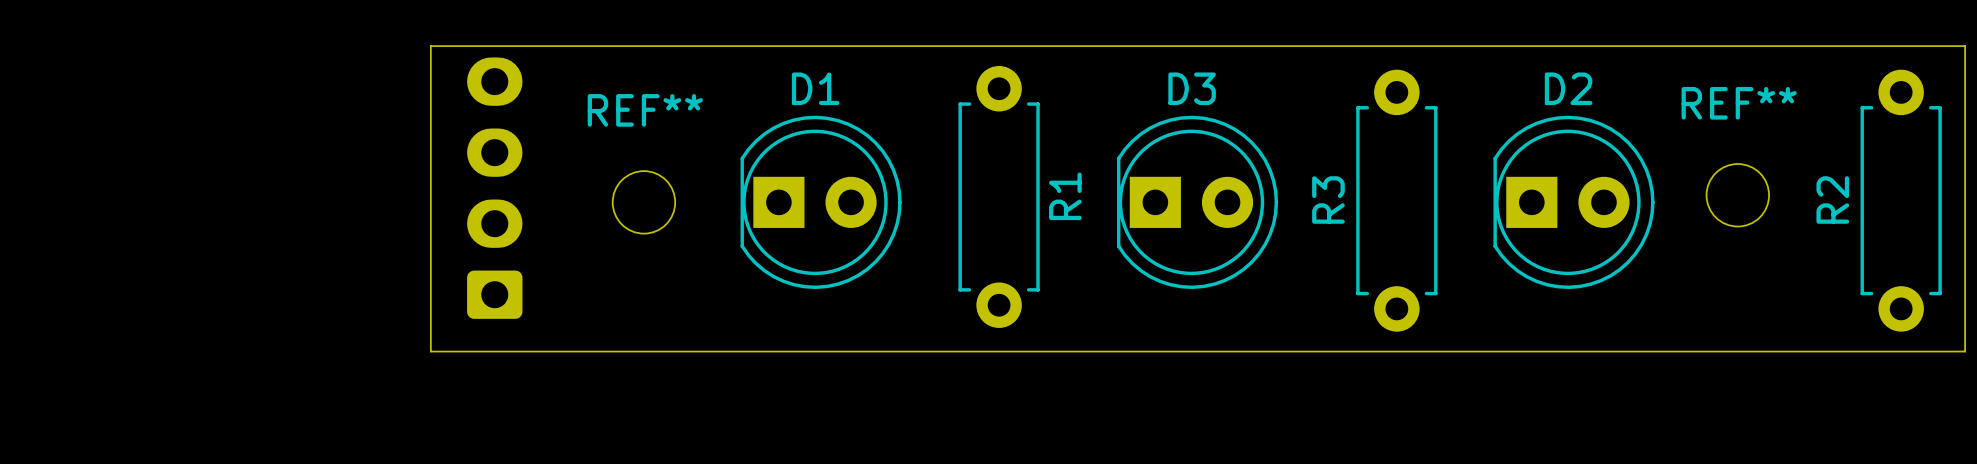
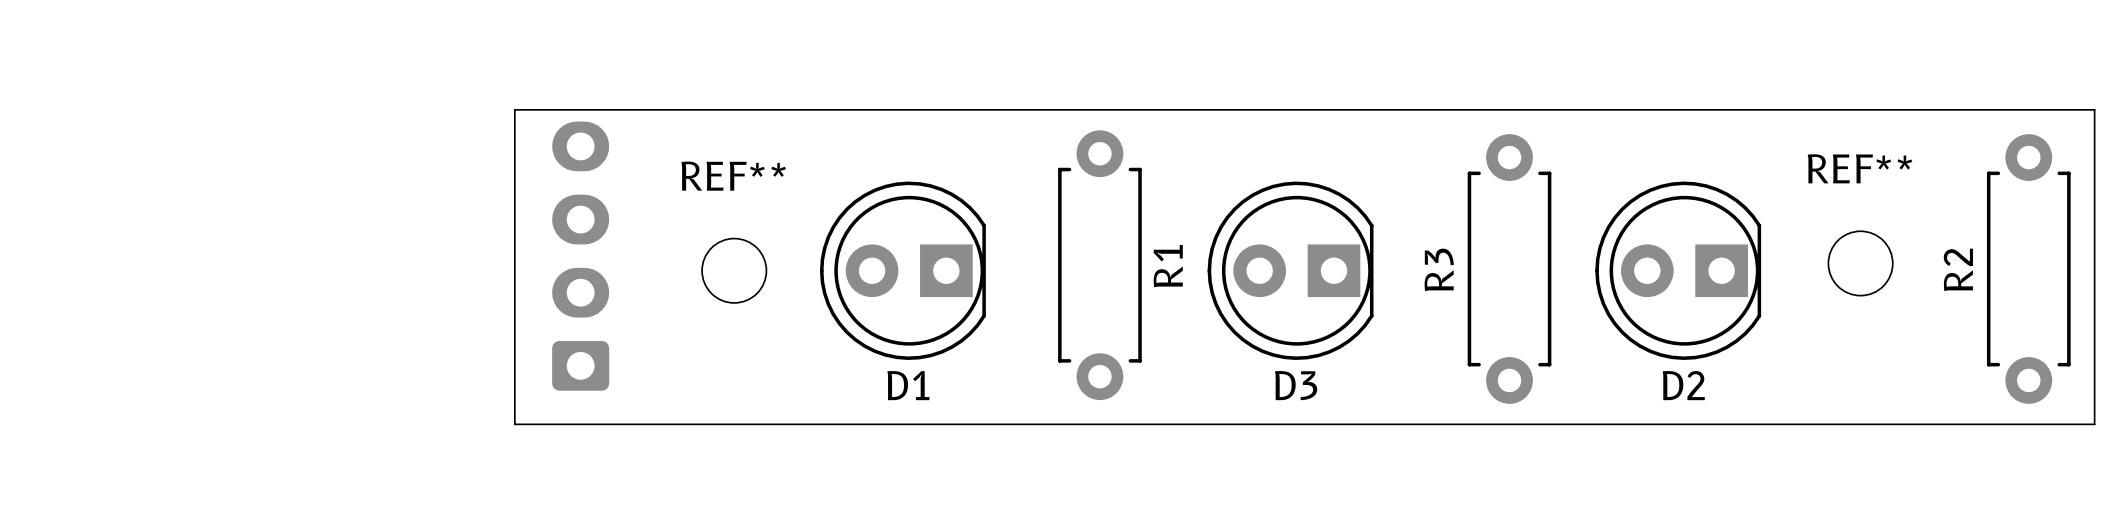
D1 rotation: 0° (821, 202) -> 180° (902, 270)
D3 rotation: 0° (1197, 202) -> 180° (1290, 270)
D2 rotation: 0° (1574, 202) -> 180° (1678, 270)

